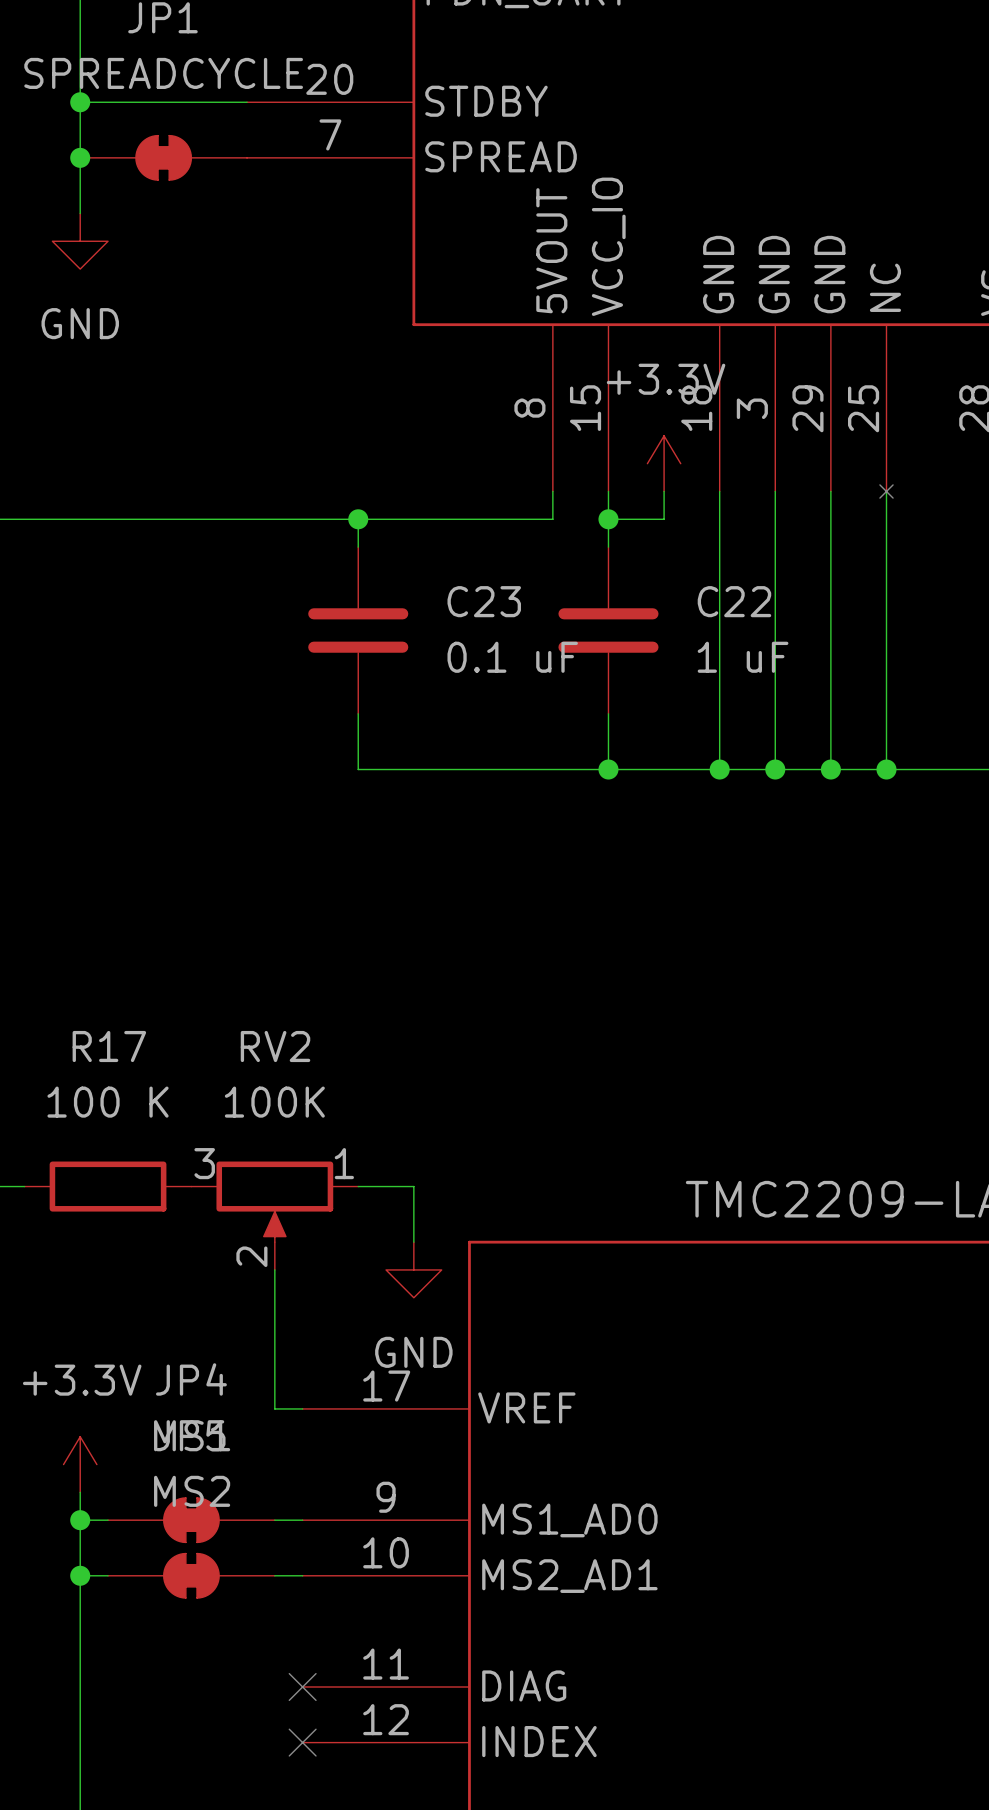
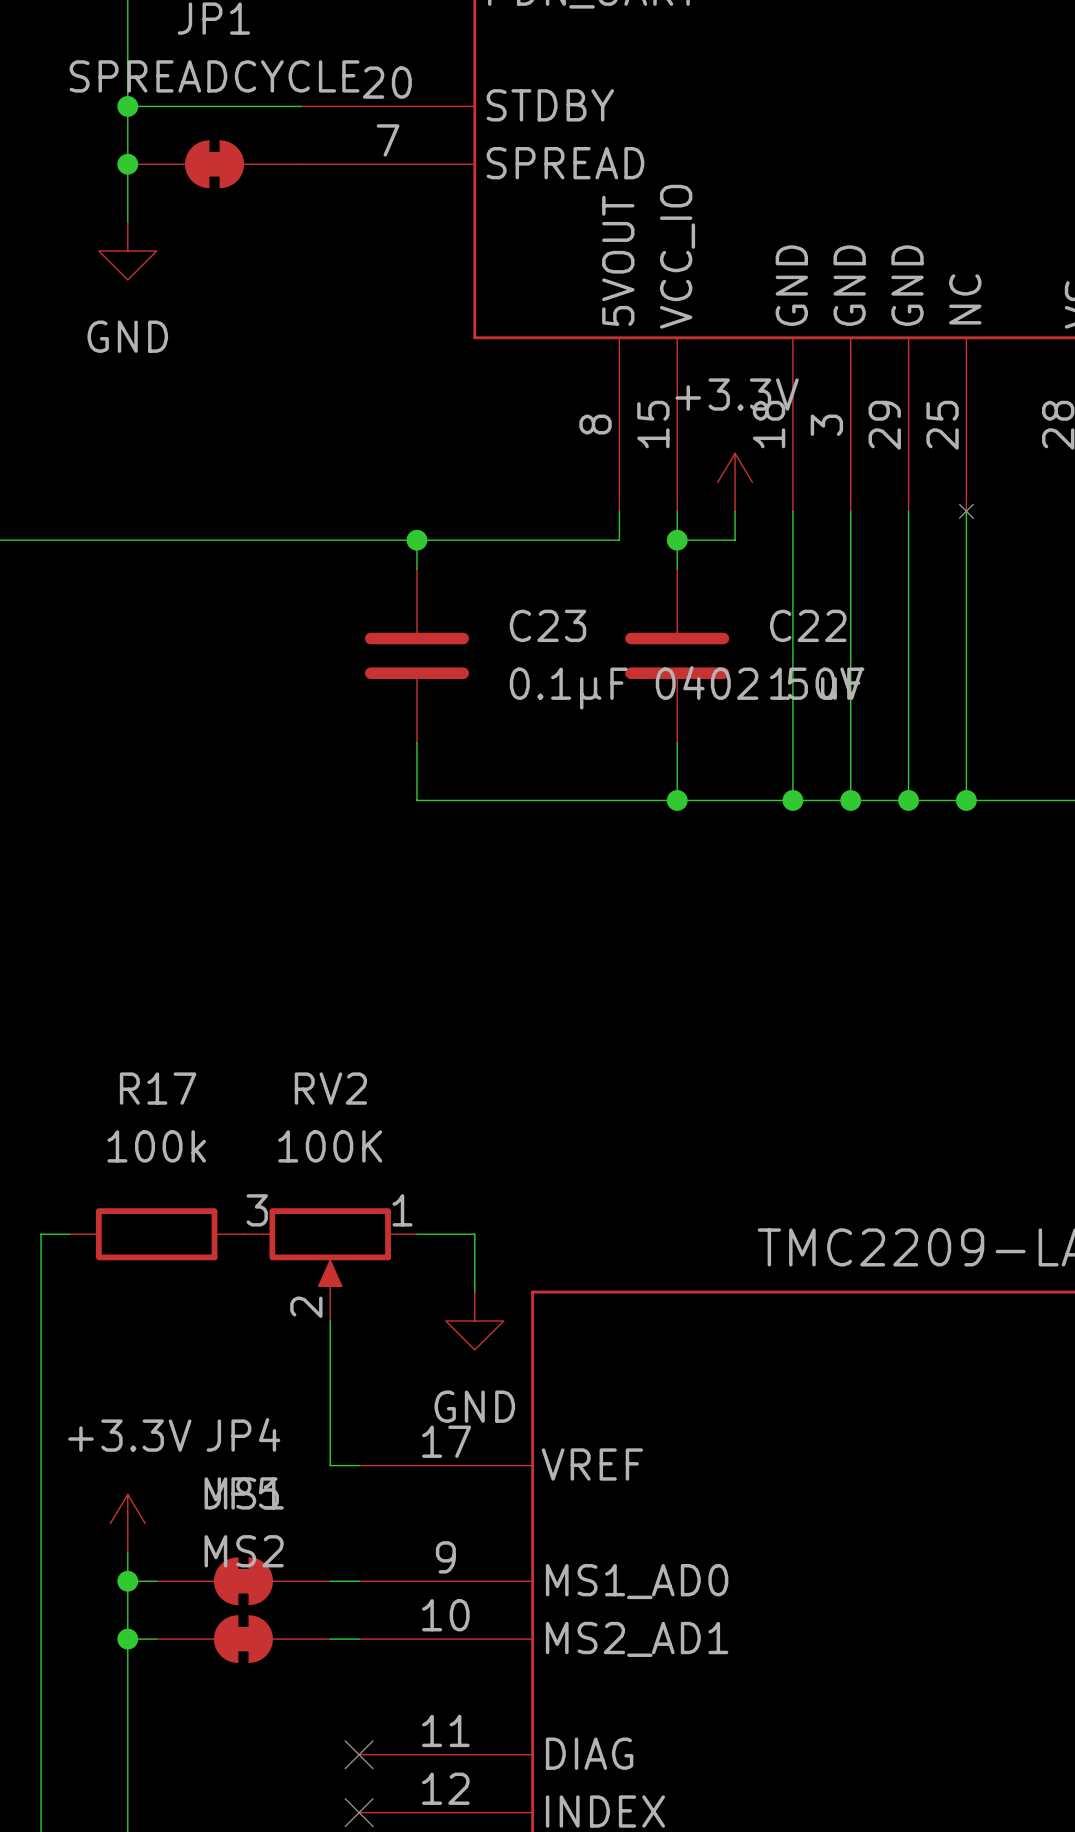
C23 value: 0.1 uF (512, 657) -> 0.1μF 0402 50V (686, 687)
R17 value: 100 K (108, 1102) -> 100k (156, 1146)

